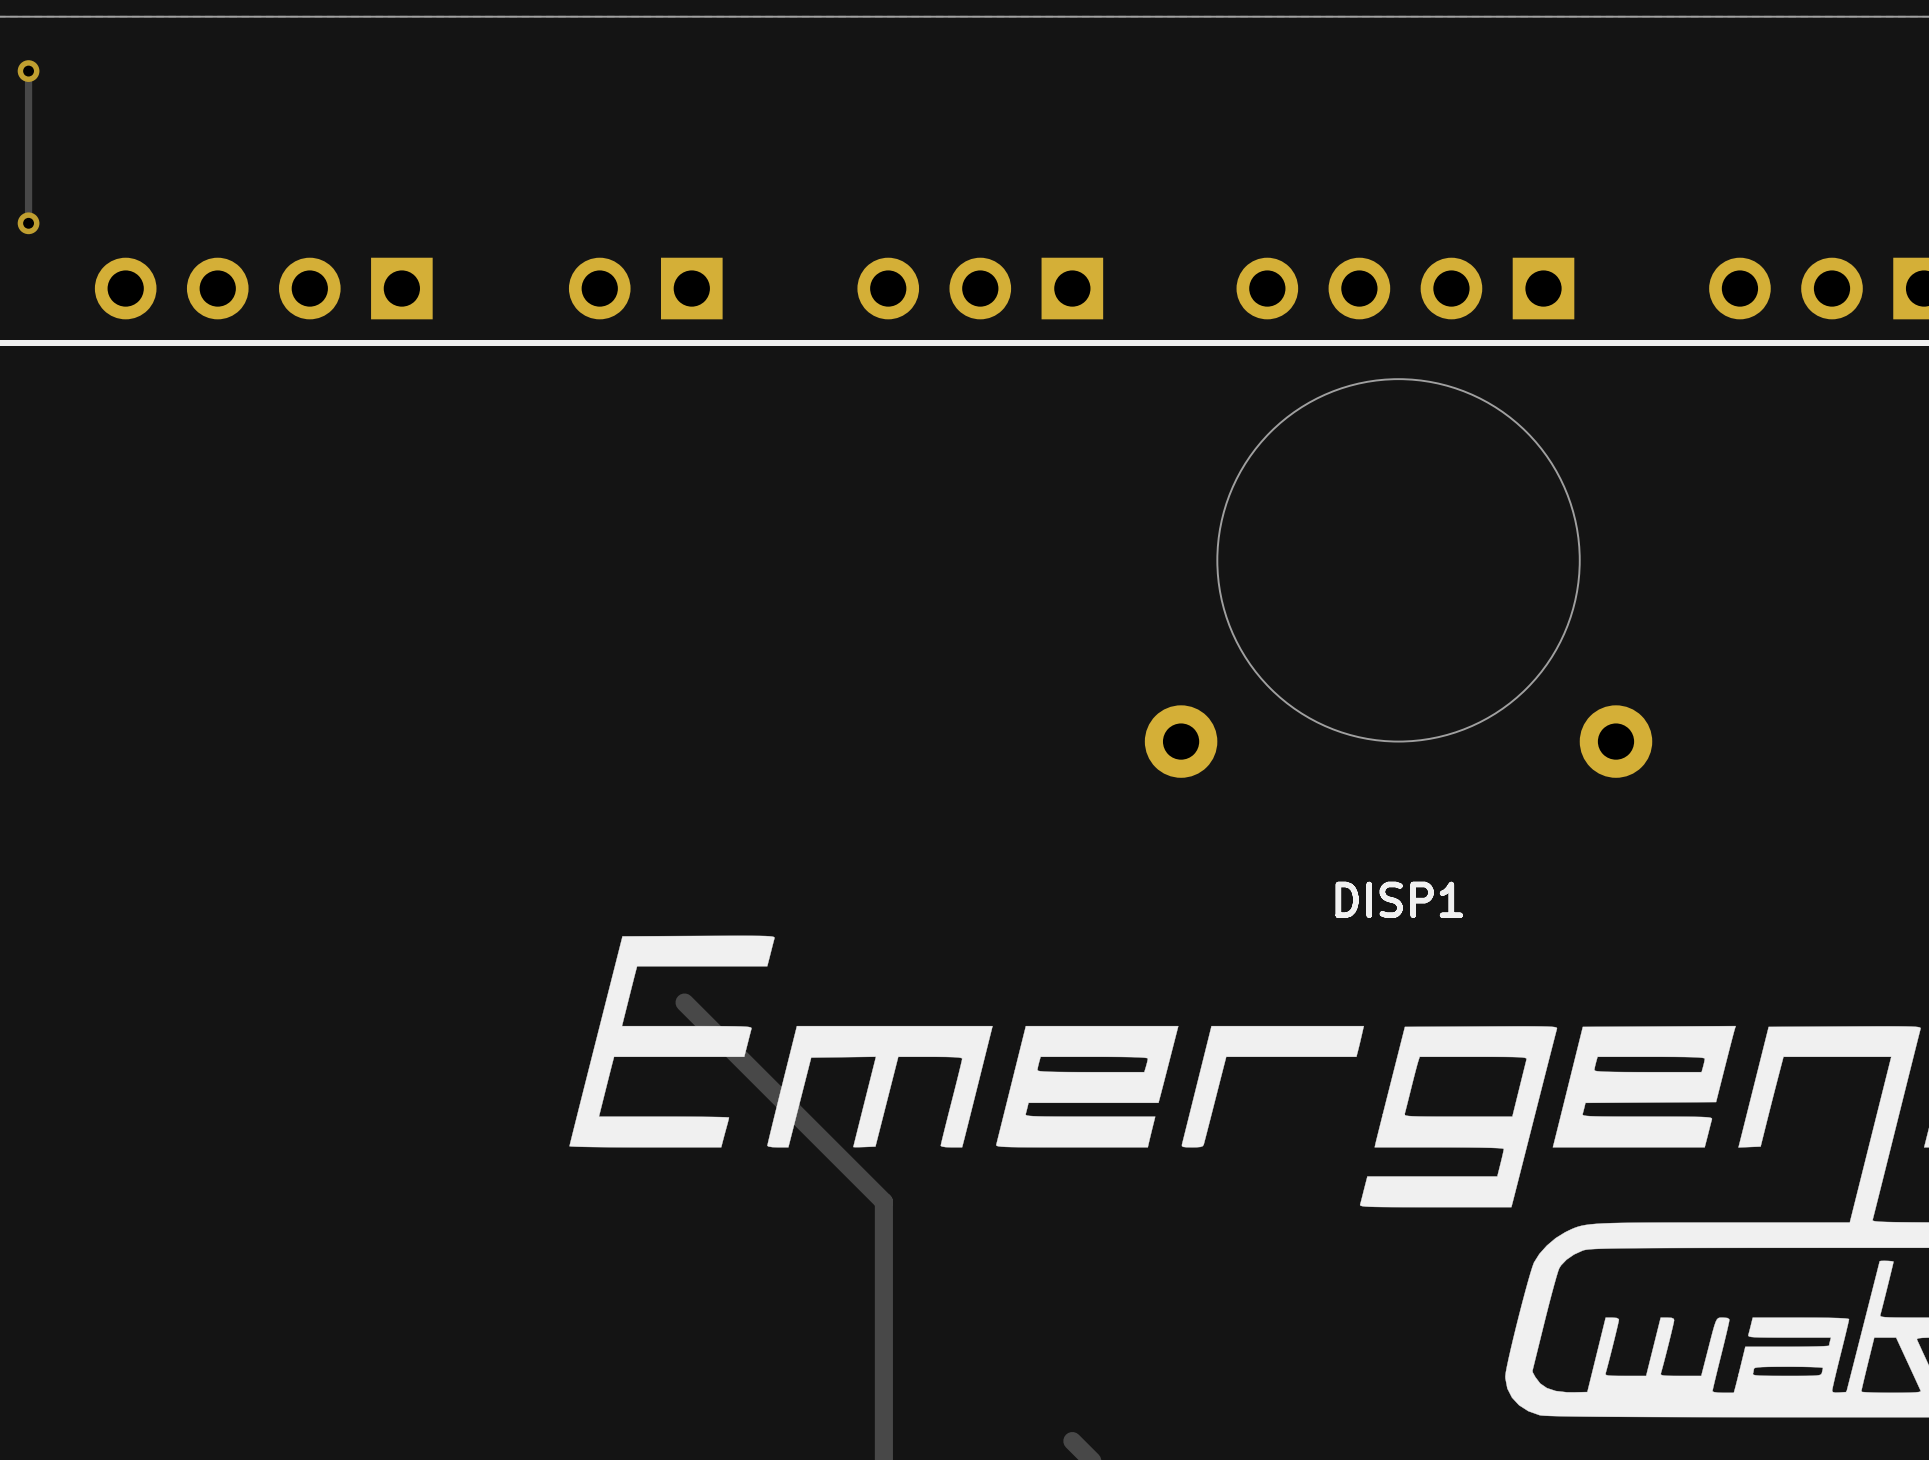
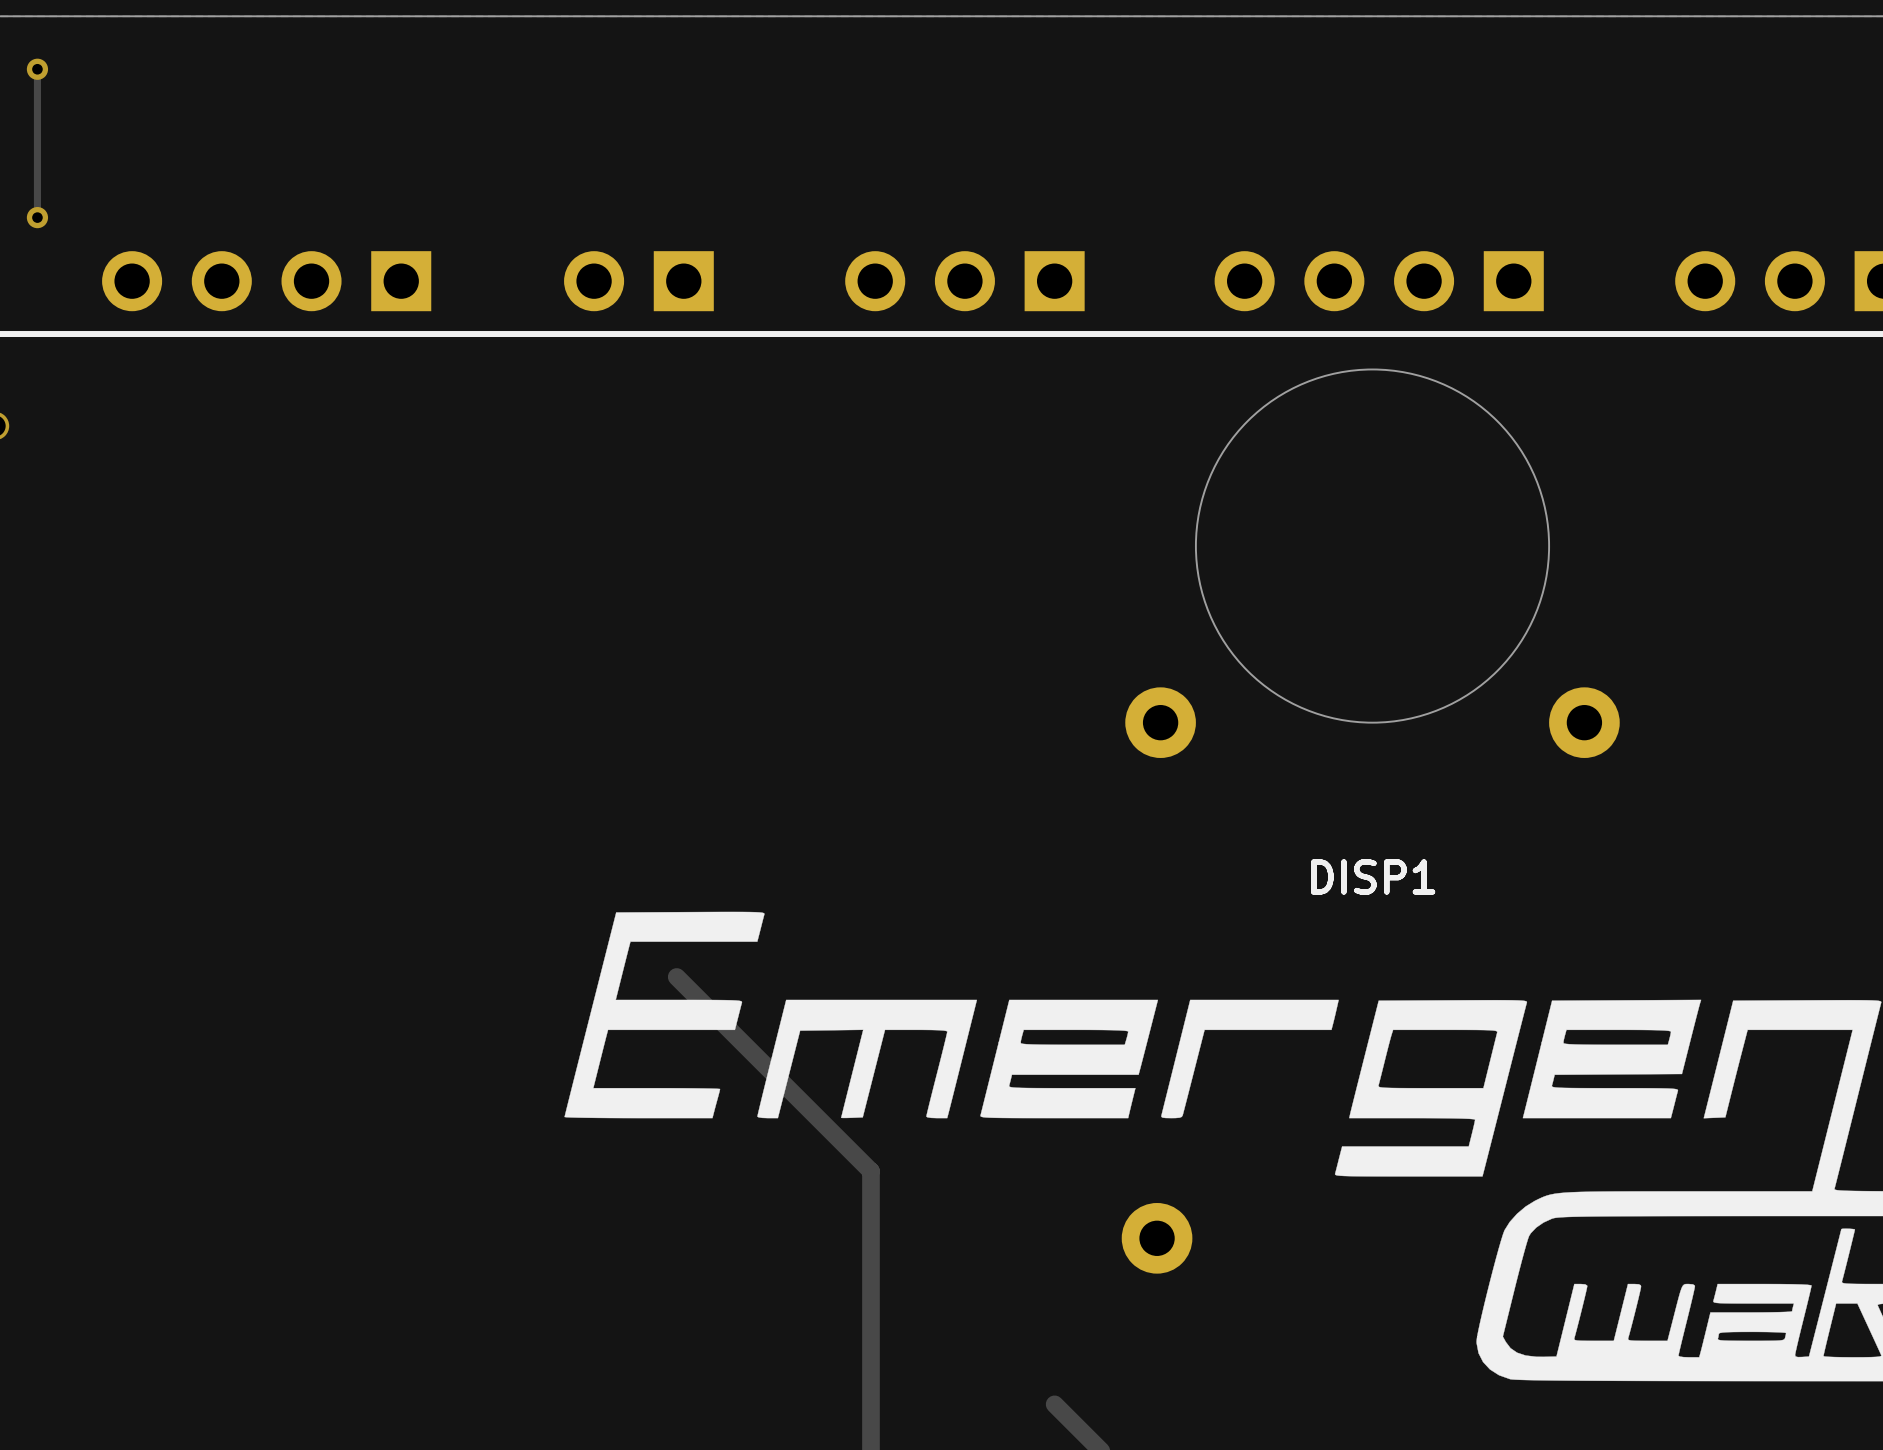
part: none -> (1157, 1238)

